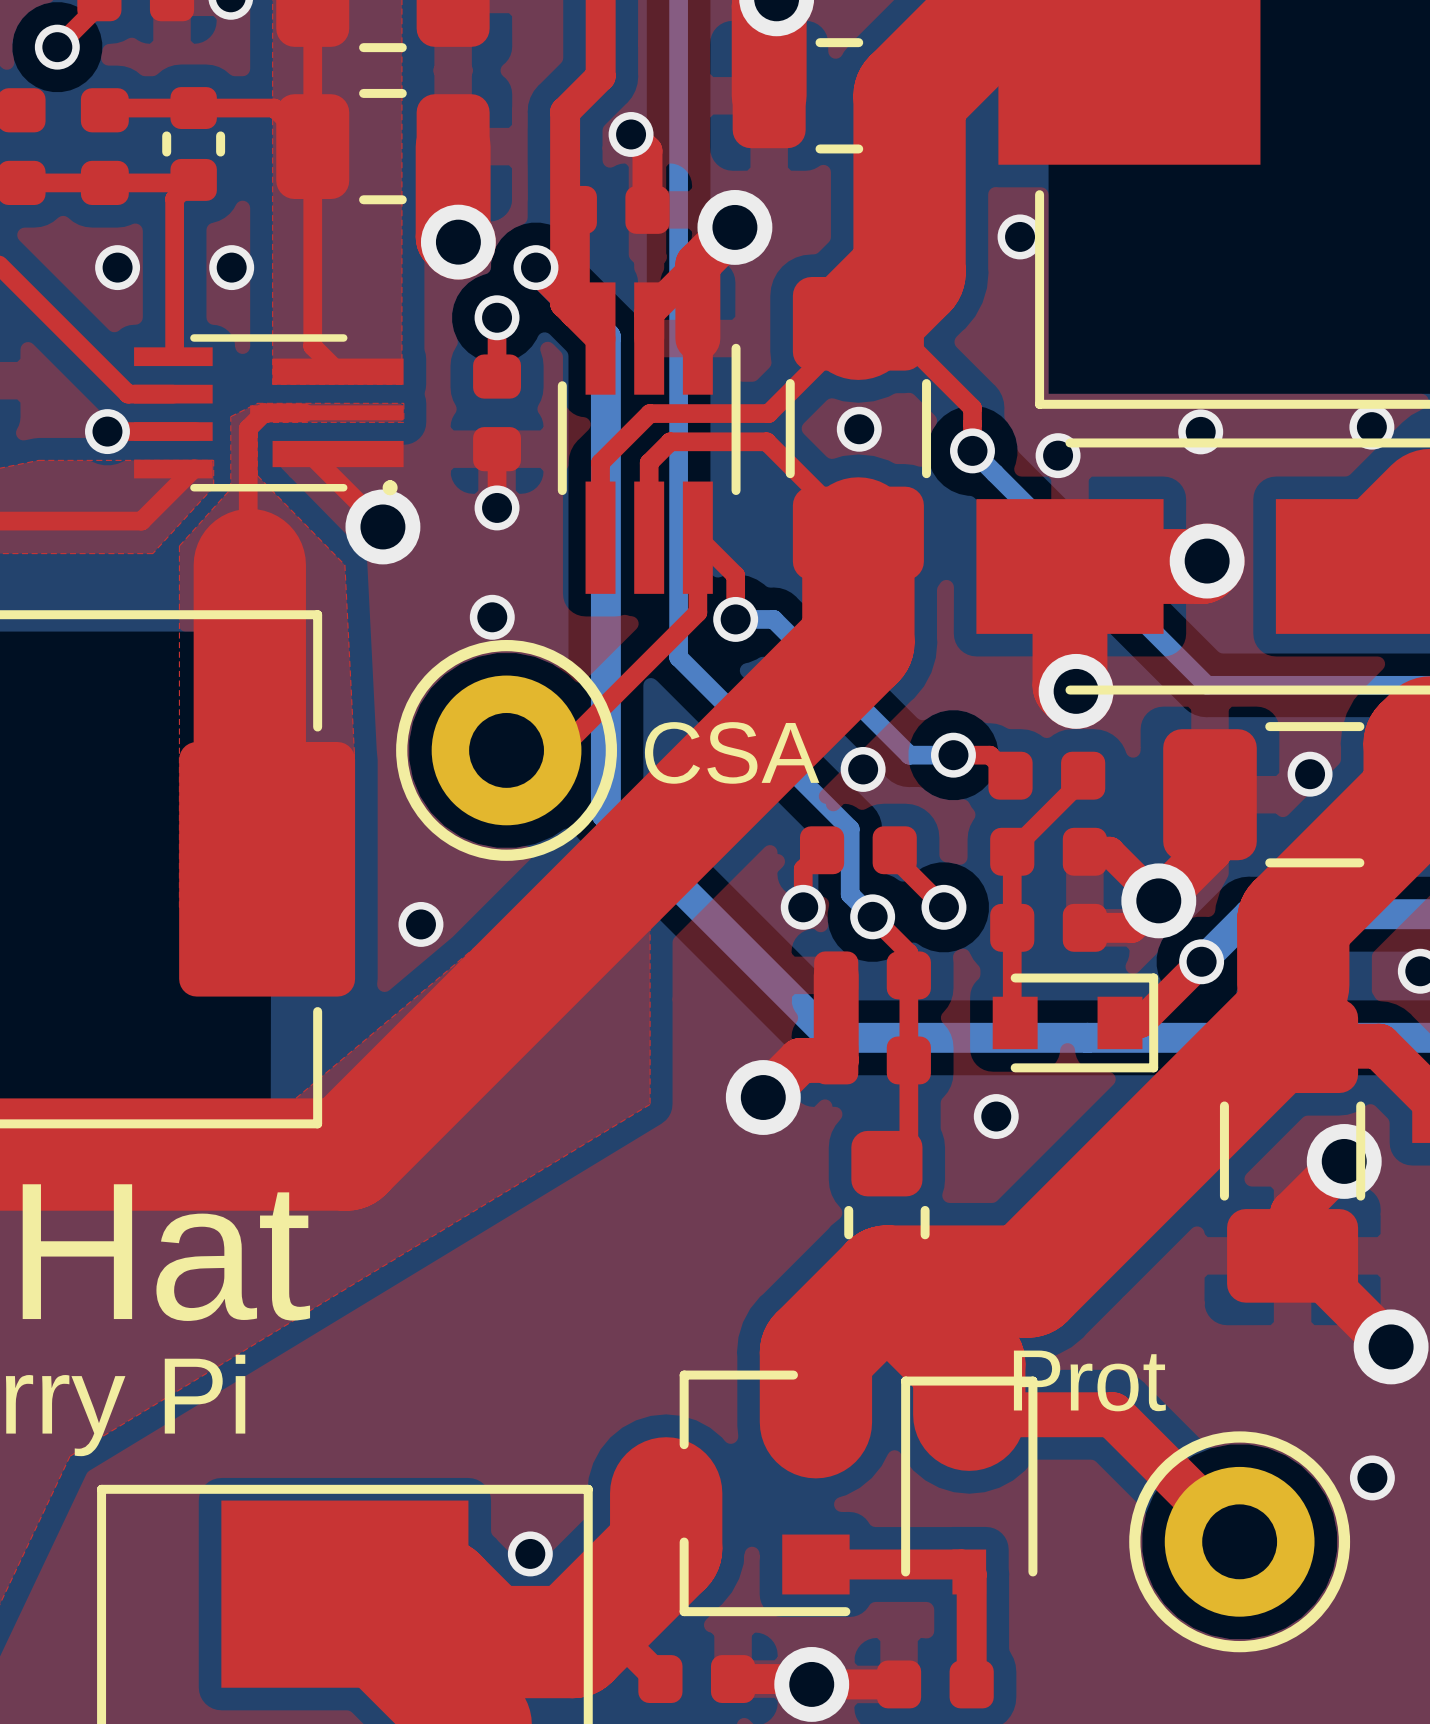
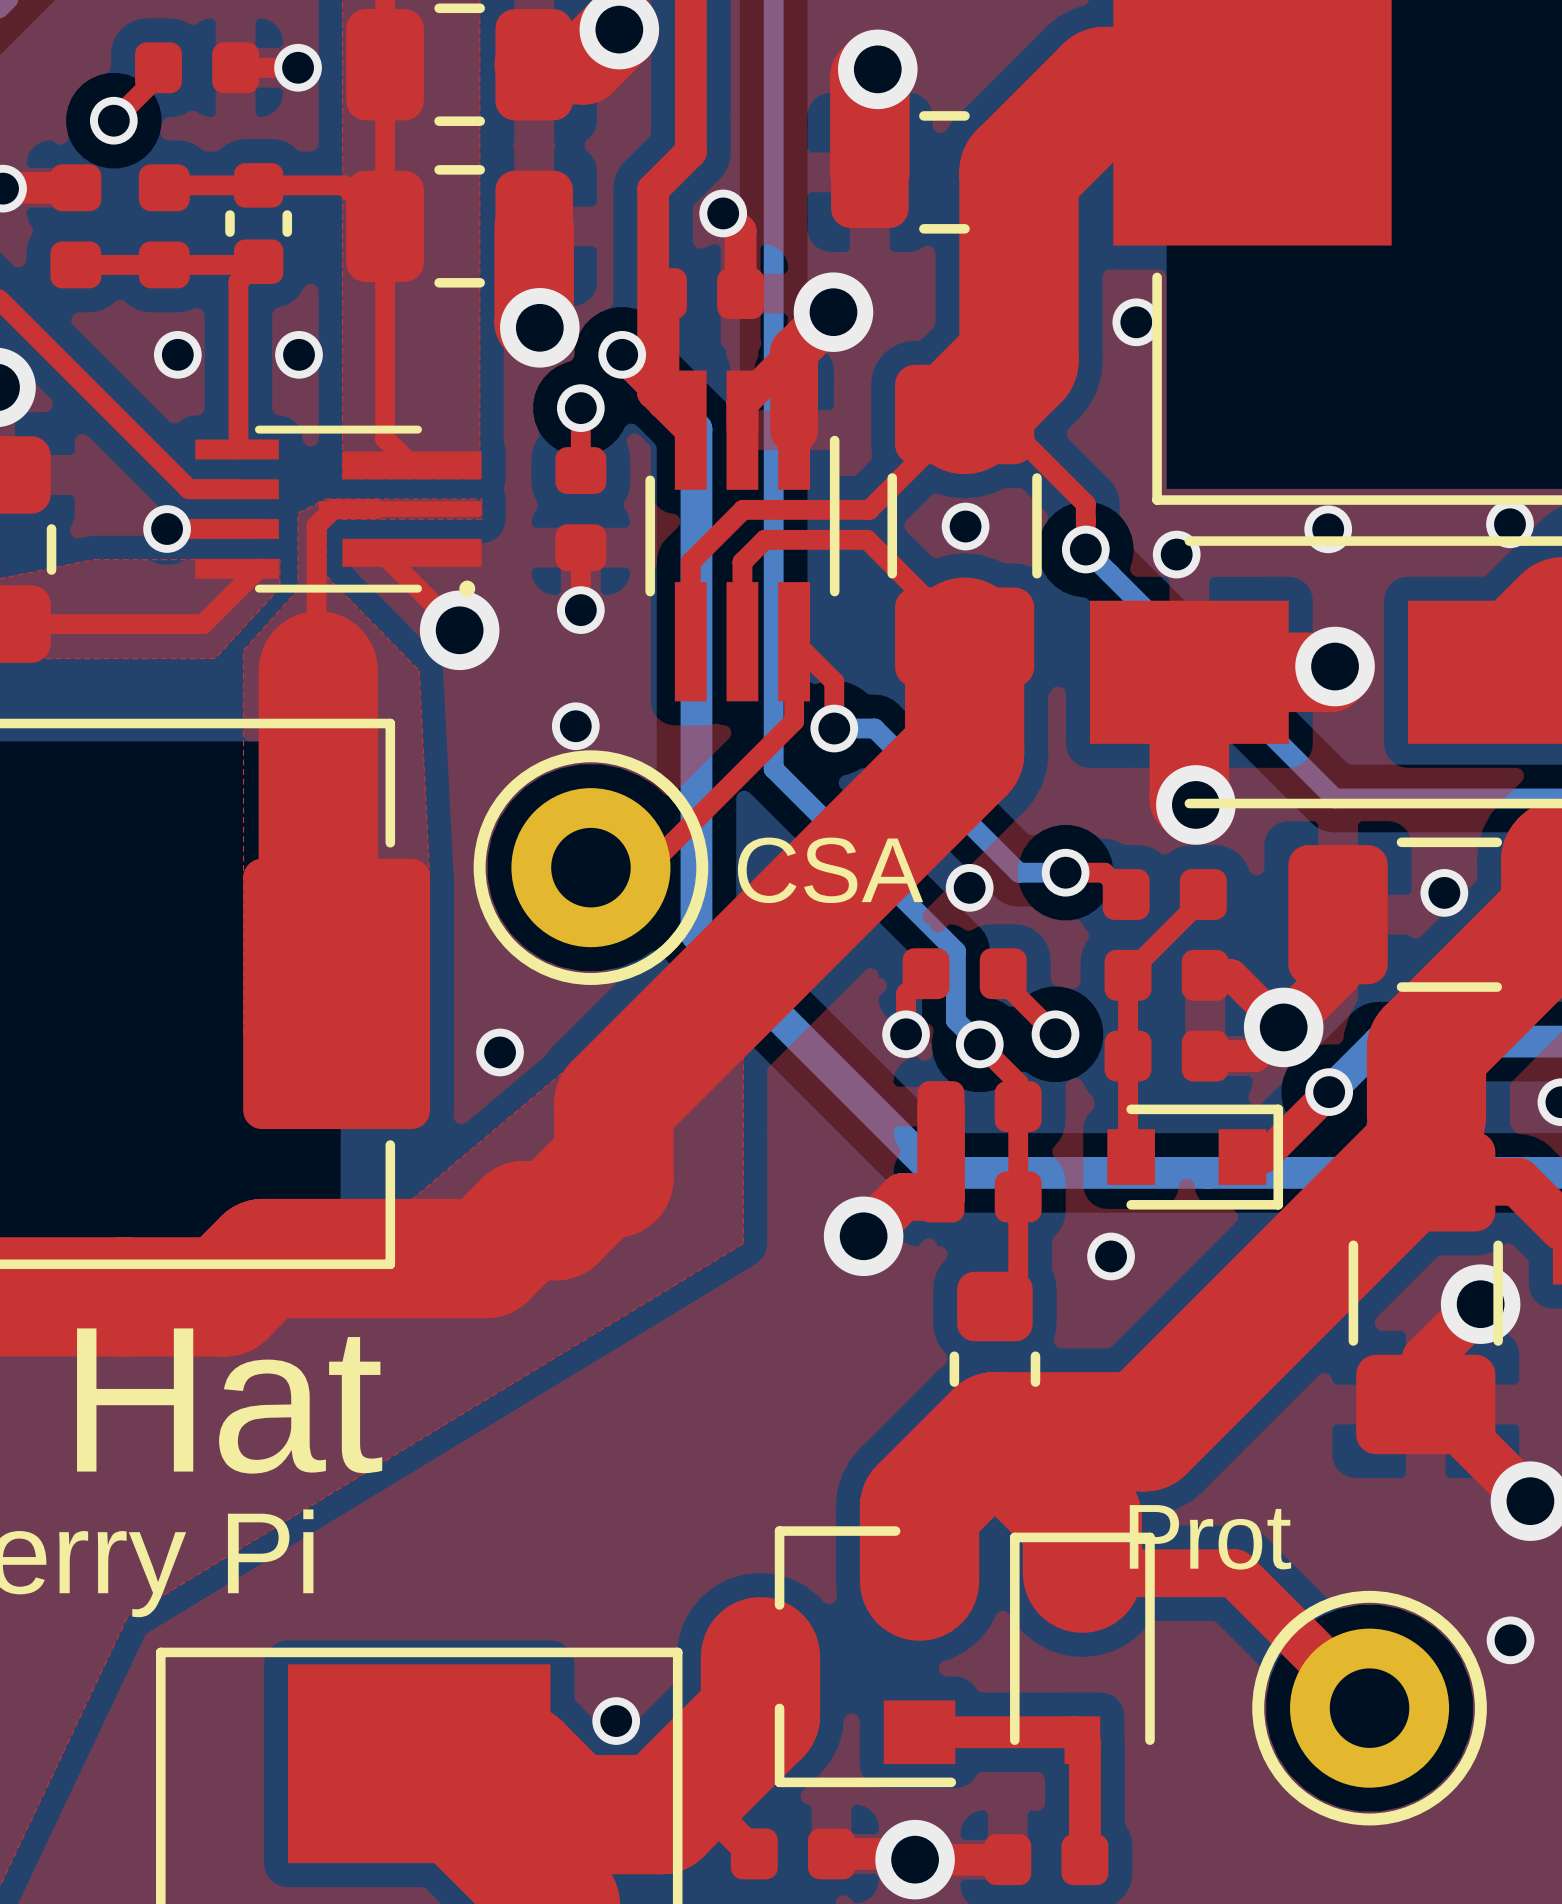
top track: (528, 972) (346, 1154) (161, 1154) -> (613, 1103) (613, 1178) (598, 1178) (556, 1220) (524, 1220) (486, 1258) (263, 1258) (224, 1296)

